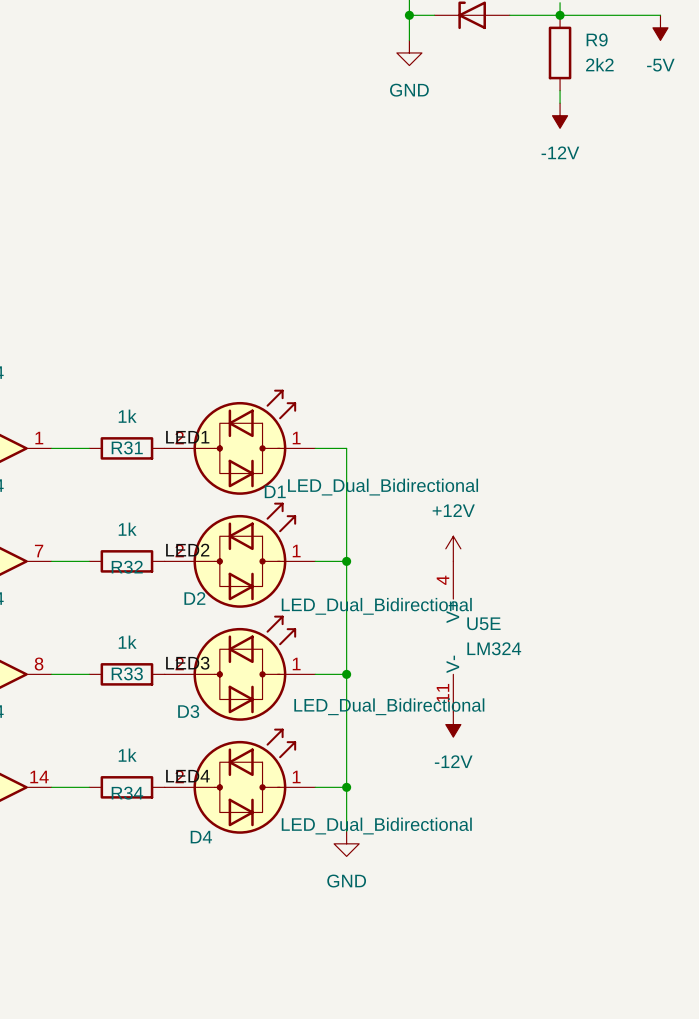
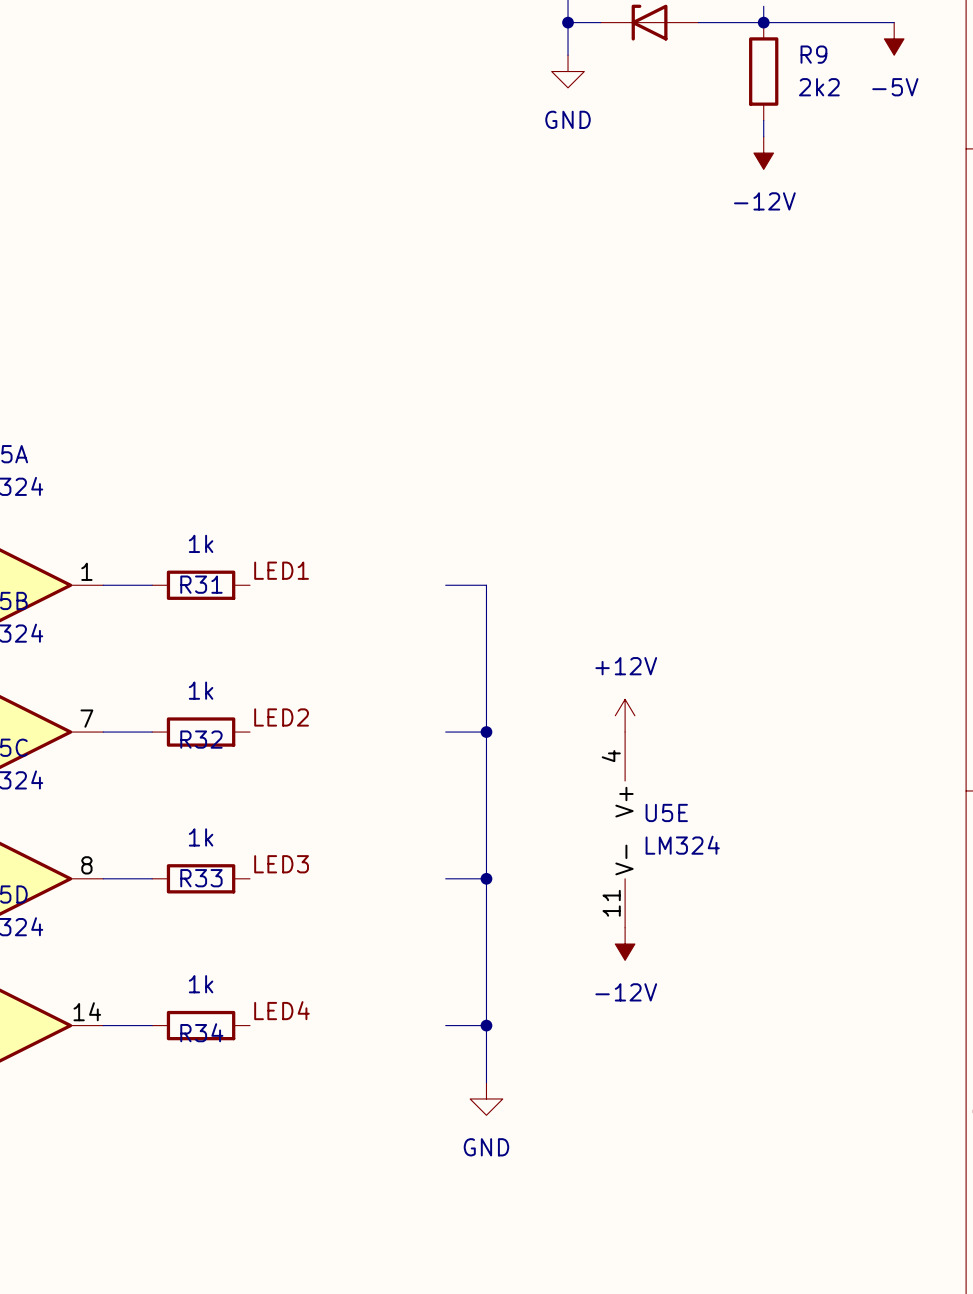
D1: LED_Dual_Bidirectional (239, 442) -> none
D2: LED_Dual_Bidirectional (239, 555) -> none
D3: LED_Dual_Bidirectional (239, 668) -> none
D4: LED_Dual_Bidirectional (239, 781) -> none

